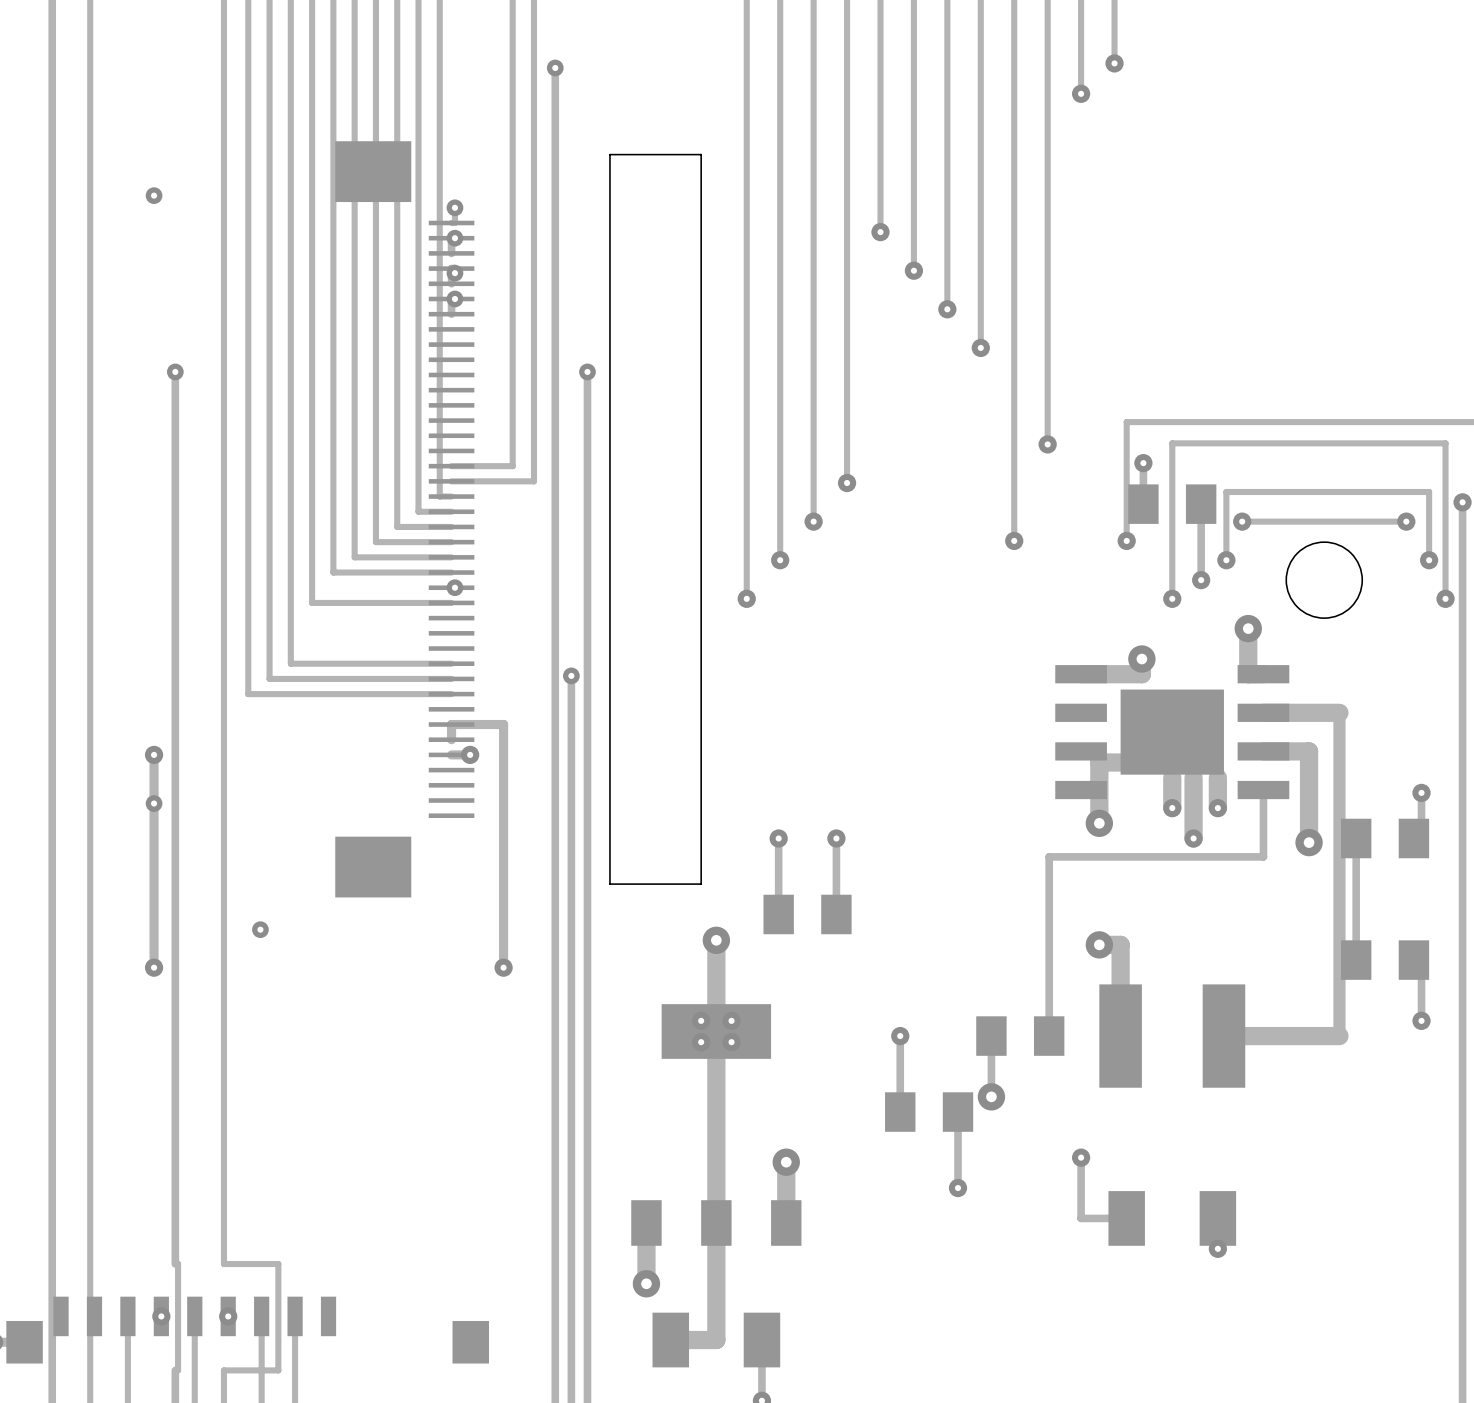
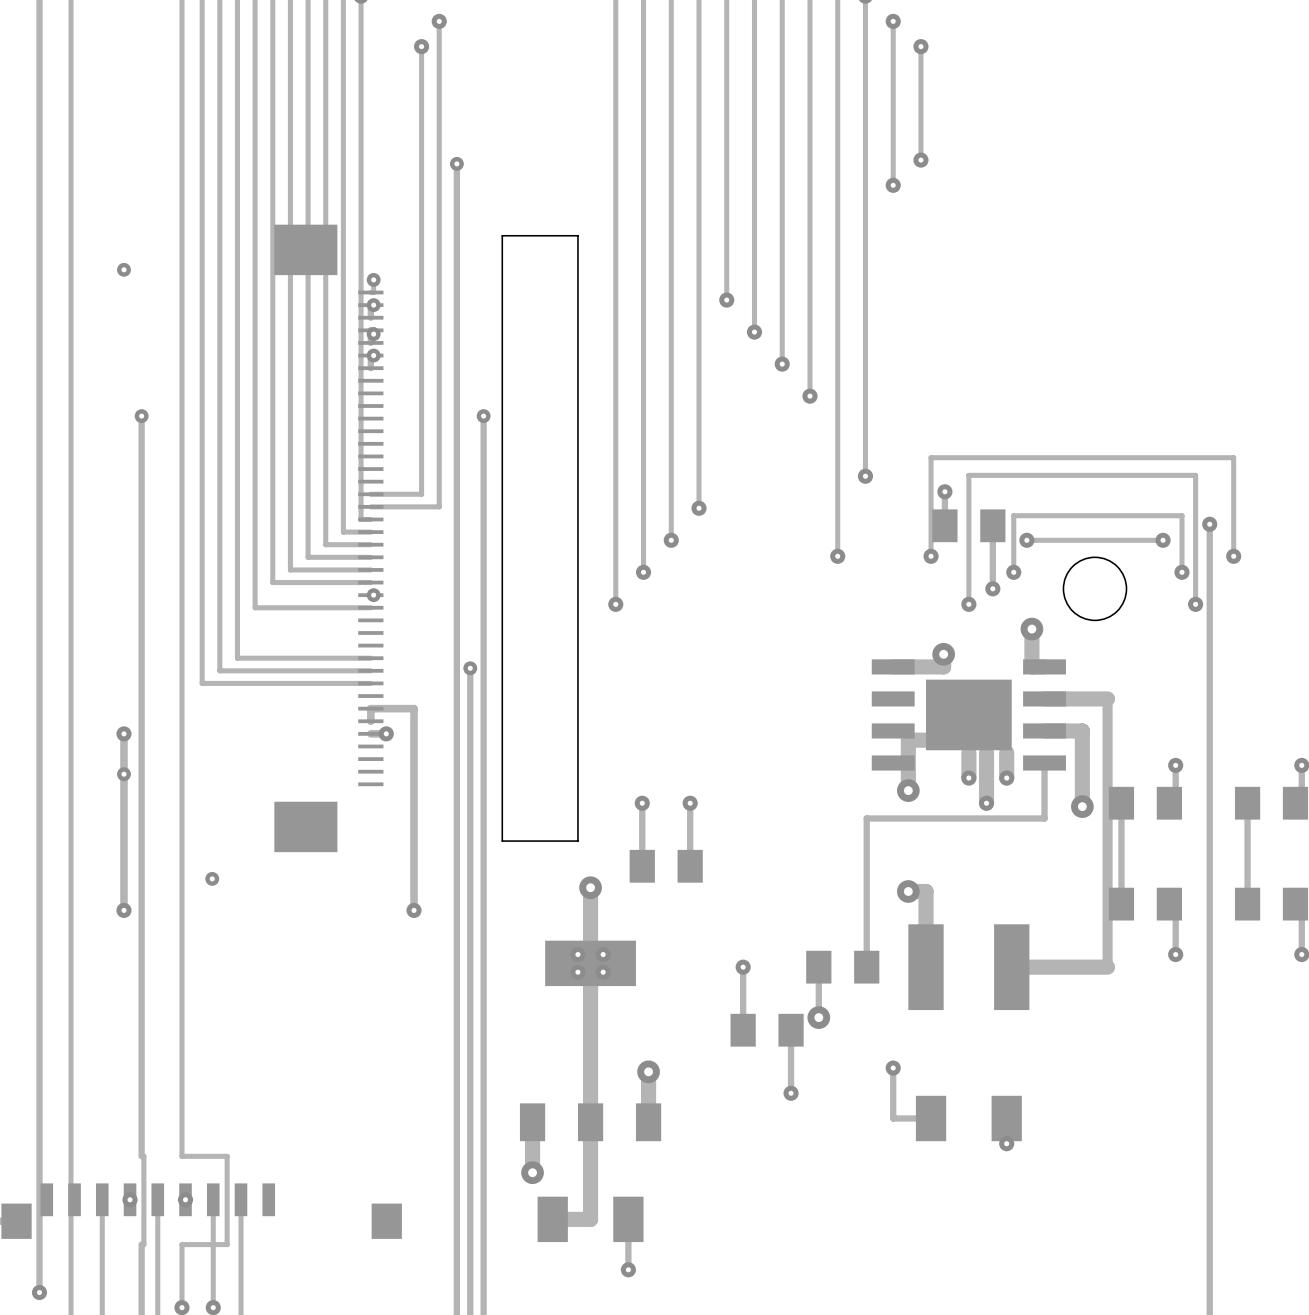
part footprint: [335, 141, 475, 898] -> [274, 224, 384, 853]

